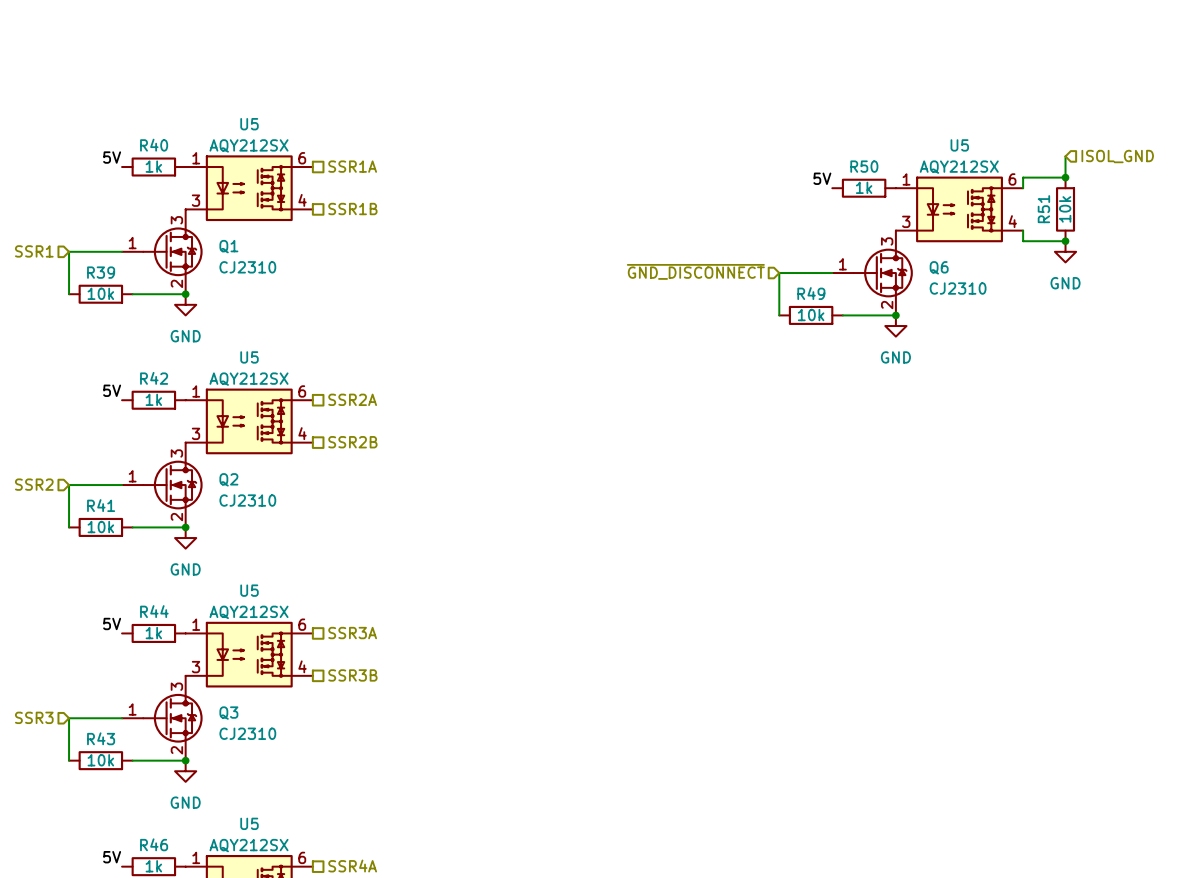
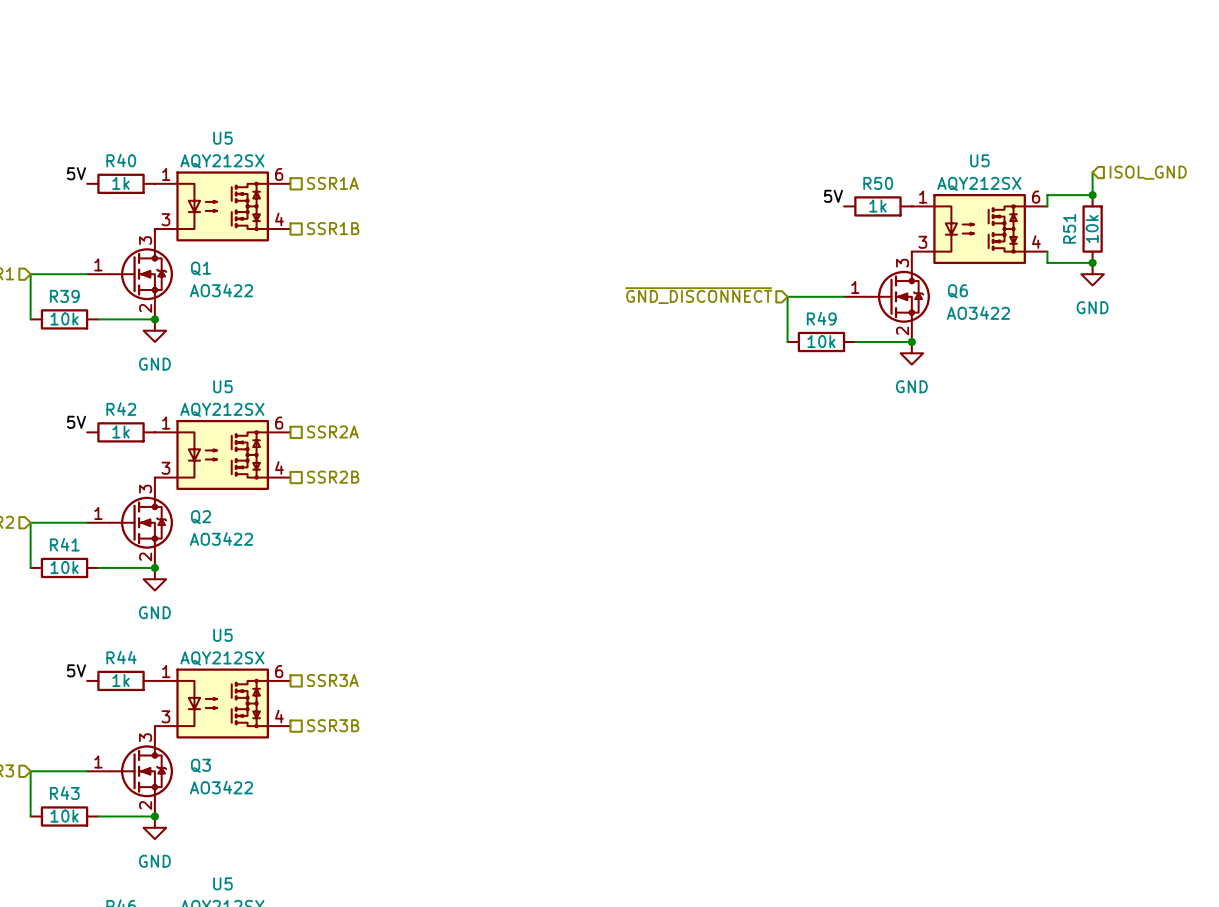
Q1 value: CJ2310 (247, 267) -> AO3422 (221, 290)
Q6 value: CJ2310 (958, 288) -> AO3422 (978, 313)
Q2 value: CJ2310 (247, 500) -> AO3422 (221, 539)
Q3 value: CJ2310 (247, 733) -> AO3422 (221, 787)

